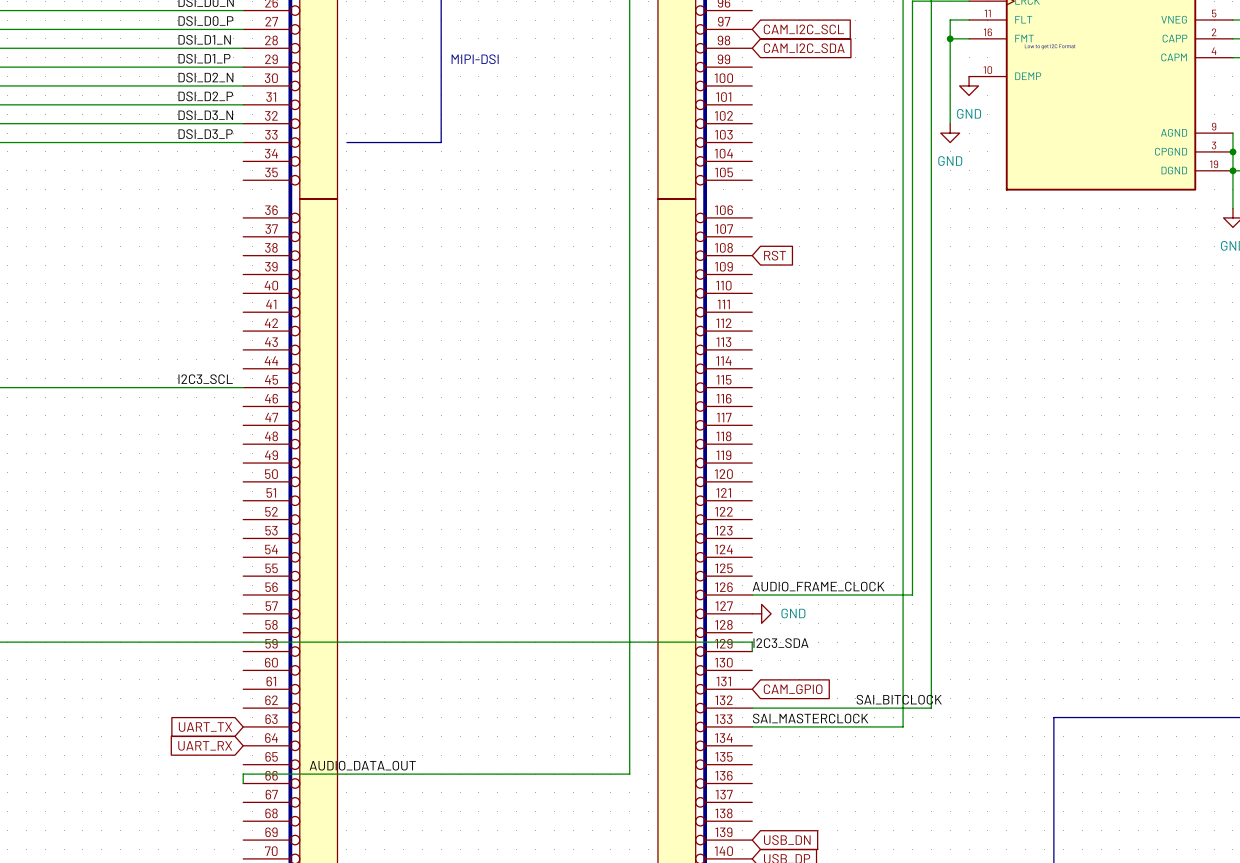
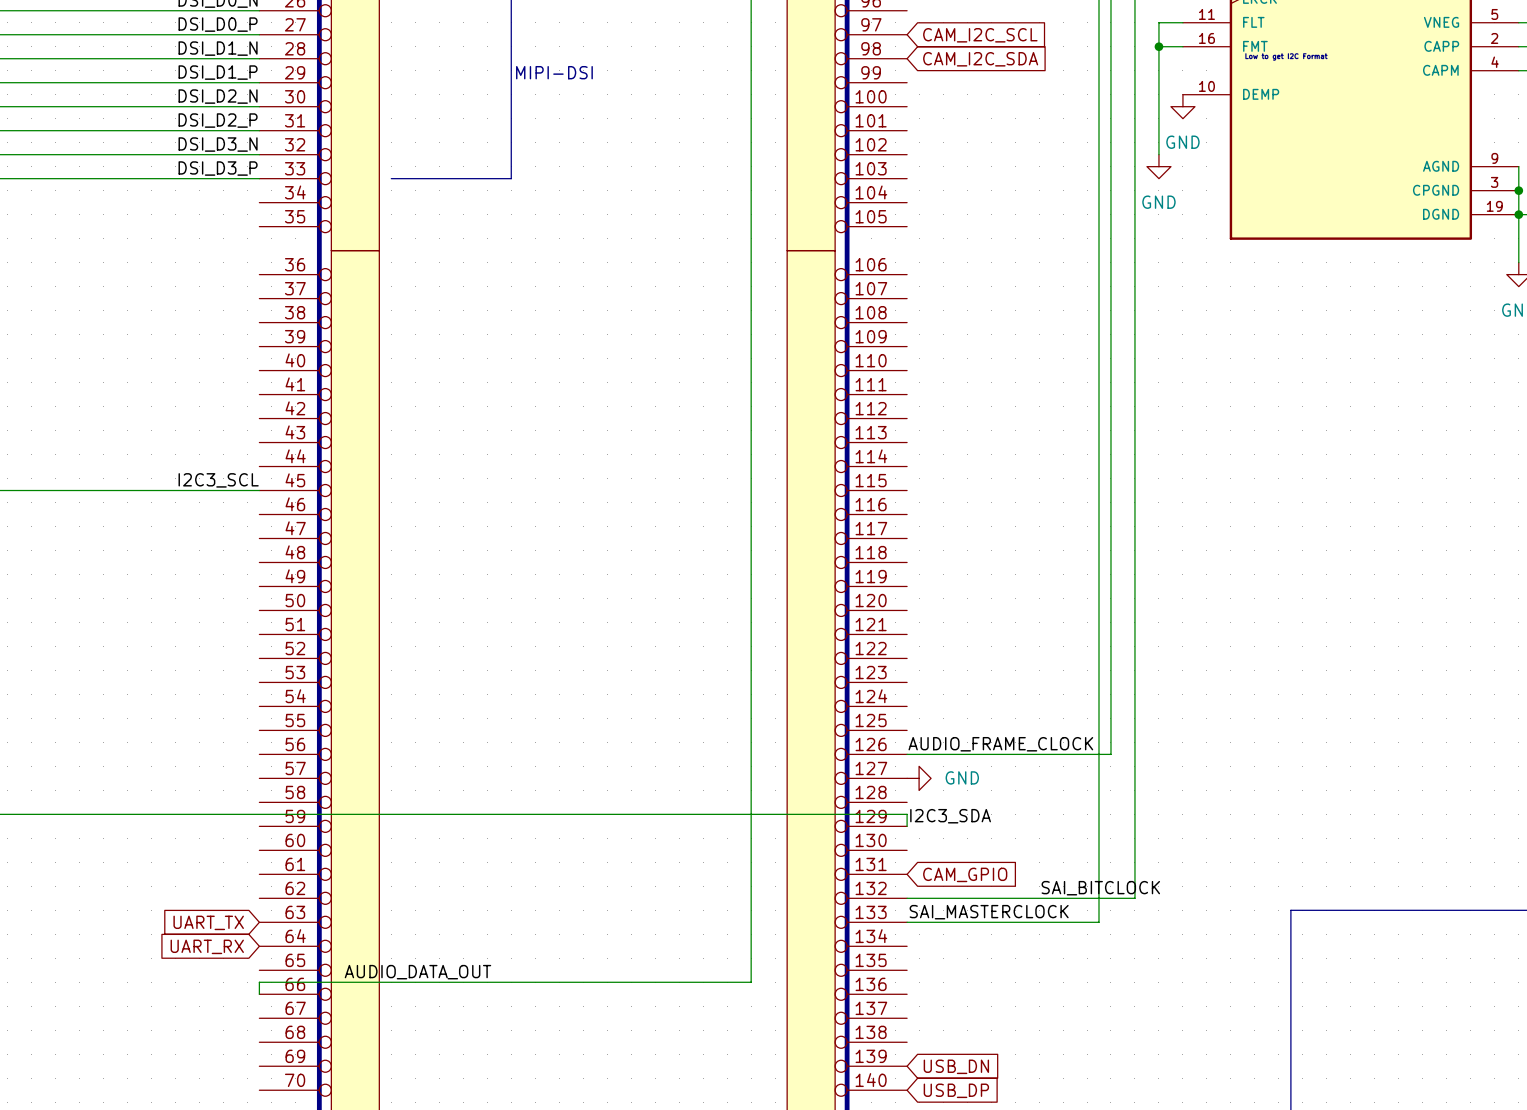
global label: RST (775, 255) -> none

